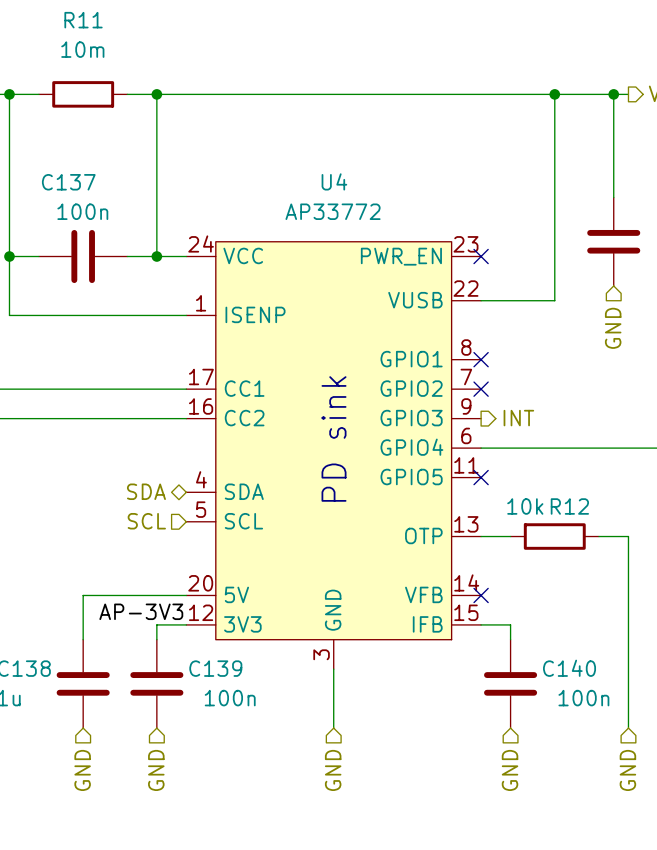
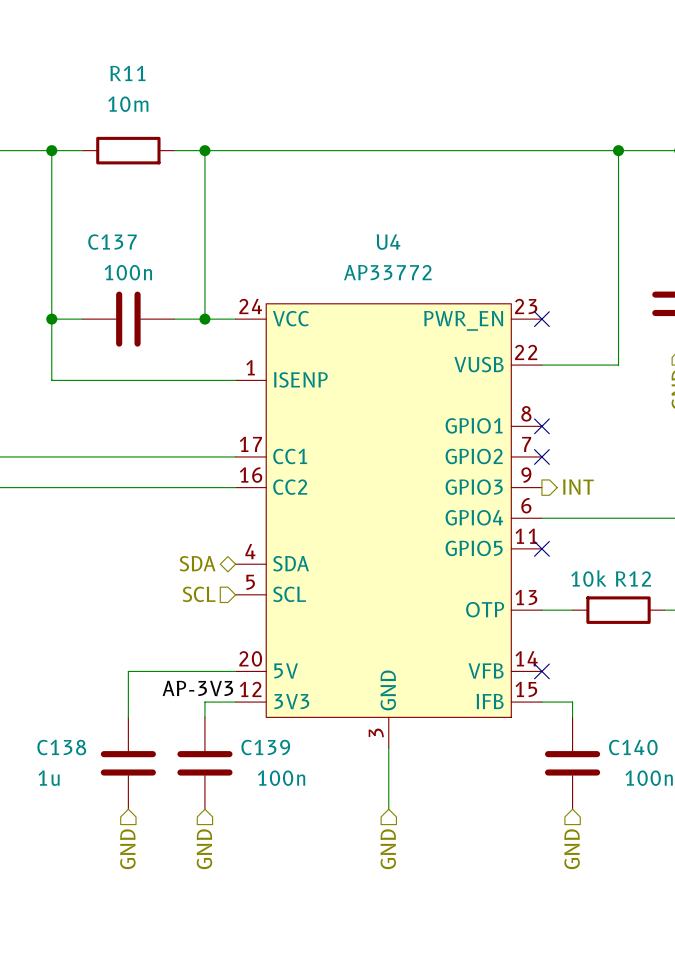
text: PD sink (334, 438) -> none

